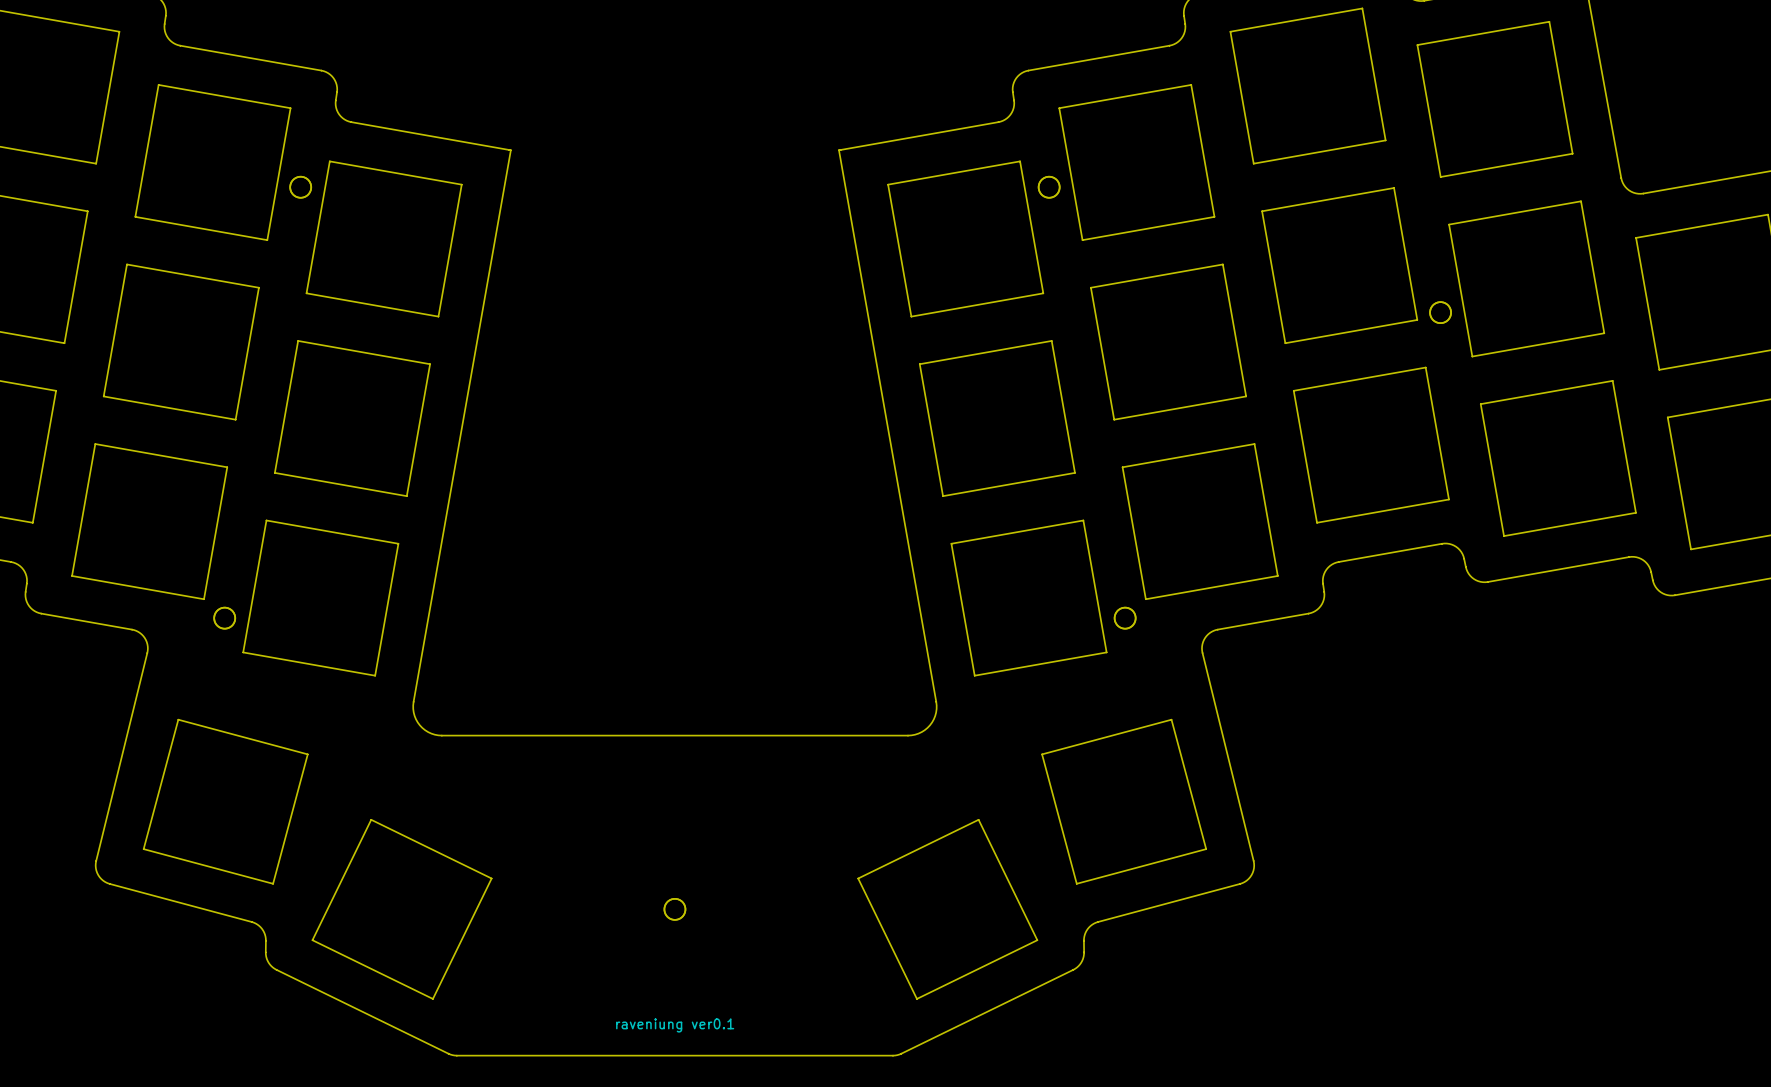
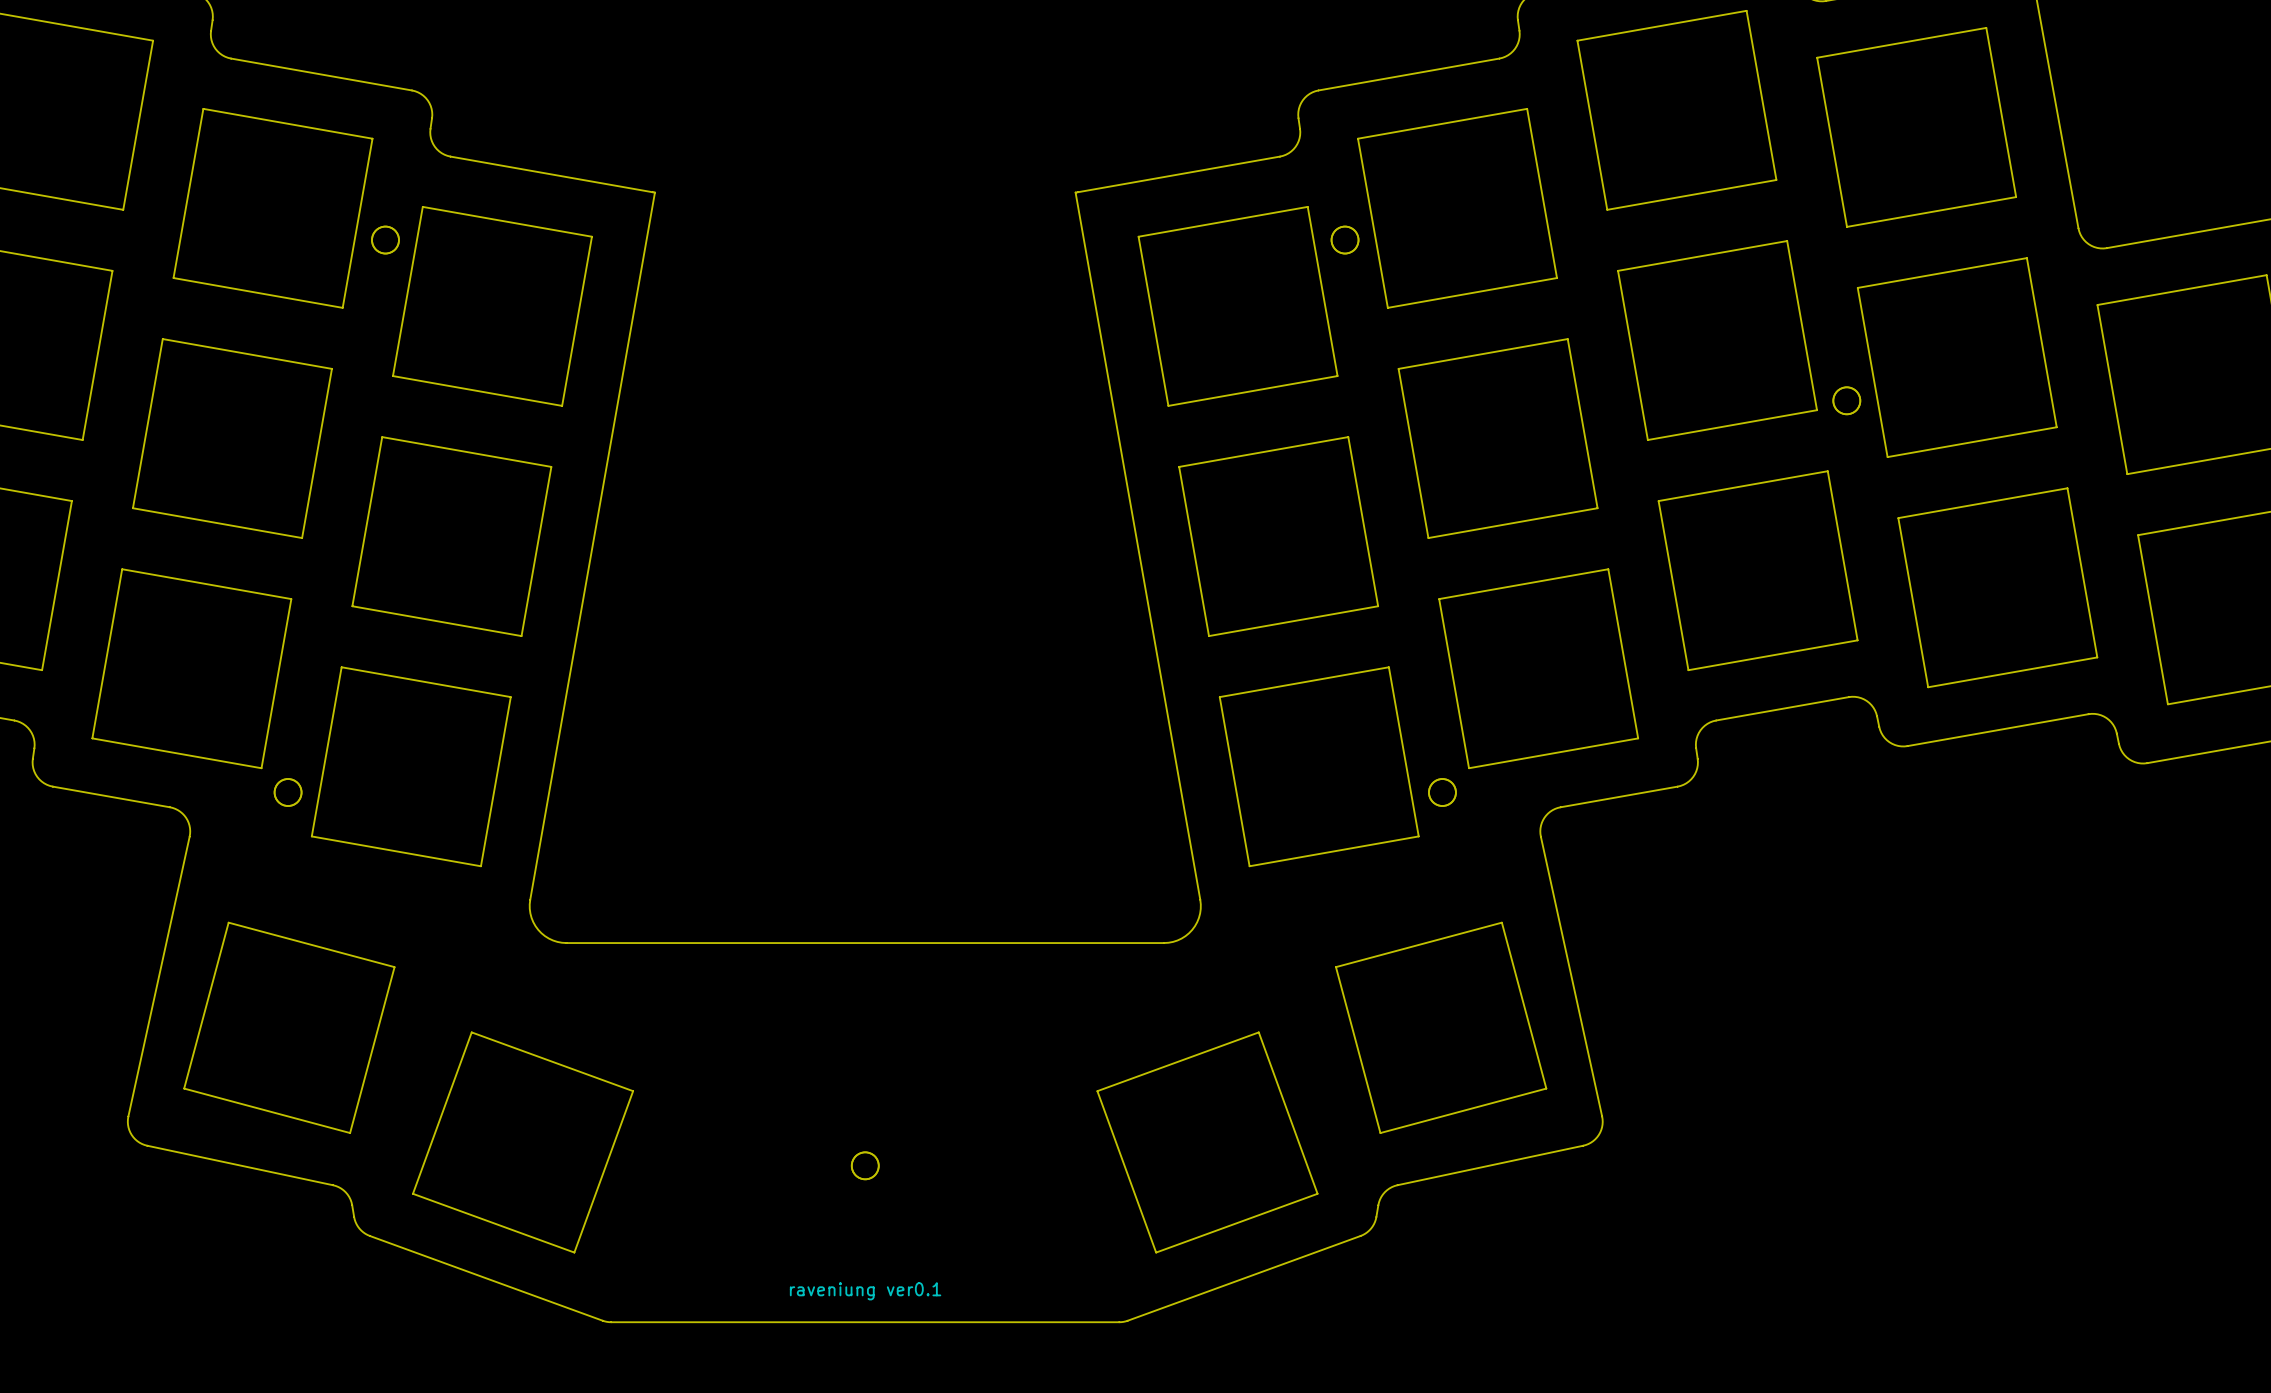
board edge: (132, 629) (143, 636) (147, 644) (147, 650) (96, 860) (95, 868) (99, 877) (109, 883) (255, 923) (264, 932) (266, 958) (274, 968) (448, 1053) (456, 1055) (897, 1055) (1075, 968) (1083, 958) (1085, 932) (1094, 923) (1244, 882) (1252, 873) (1253, 860) (1202, 650) (1205, 638) (1211, 631) (1217, 629) -> (169, 807) (177, 810) (184, 815) (189, 825) (190, 833) (128, 1116) (128, 1127) (133, 1137) (147, 1145) (335, 1186) (343, 1190) (349, 1196) (356, 1224) (367, 1234) (611, 1322) (1123, 1321) (1362, 1234) (1373, 1224) (1381, 1196) (1386, 1190) (1394, 1186) (1590, 1142) (1600, 1132) (1602, 1116) (1540, 833) (1541, 825) (1546, 815) (1552, 810) (1561, 807)
board edge: (371, 819) (491, 878) (432, 998) (312, 940) (371, 819) -> (471, 1032) (412, 1193) (574, 1252) (633, 1091) (471, 1032)
board edge: (978, 819) (1037, 940) (916, 998) (858, 878) (978, 819) -> (1258, 1032) (1097, 1091) (1156, 1252) (1317, 1193) (1258, 1032)
text position: raveniung ver0.1 (675, 1025) -> raveniung ver0.1 (865, 1291)

